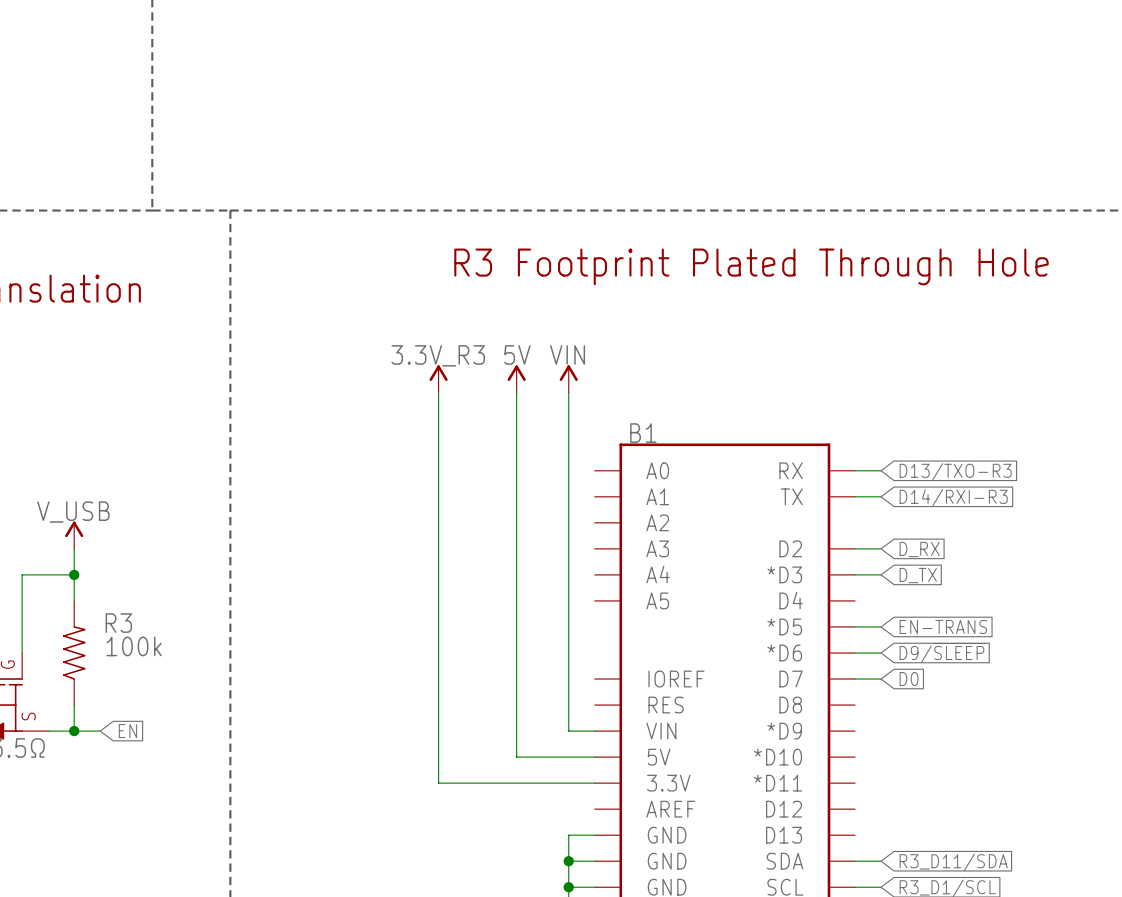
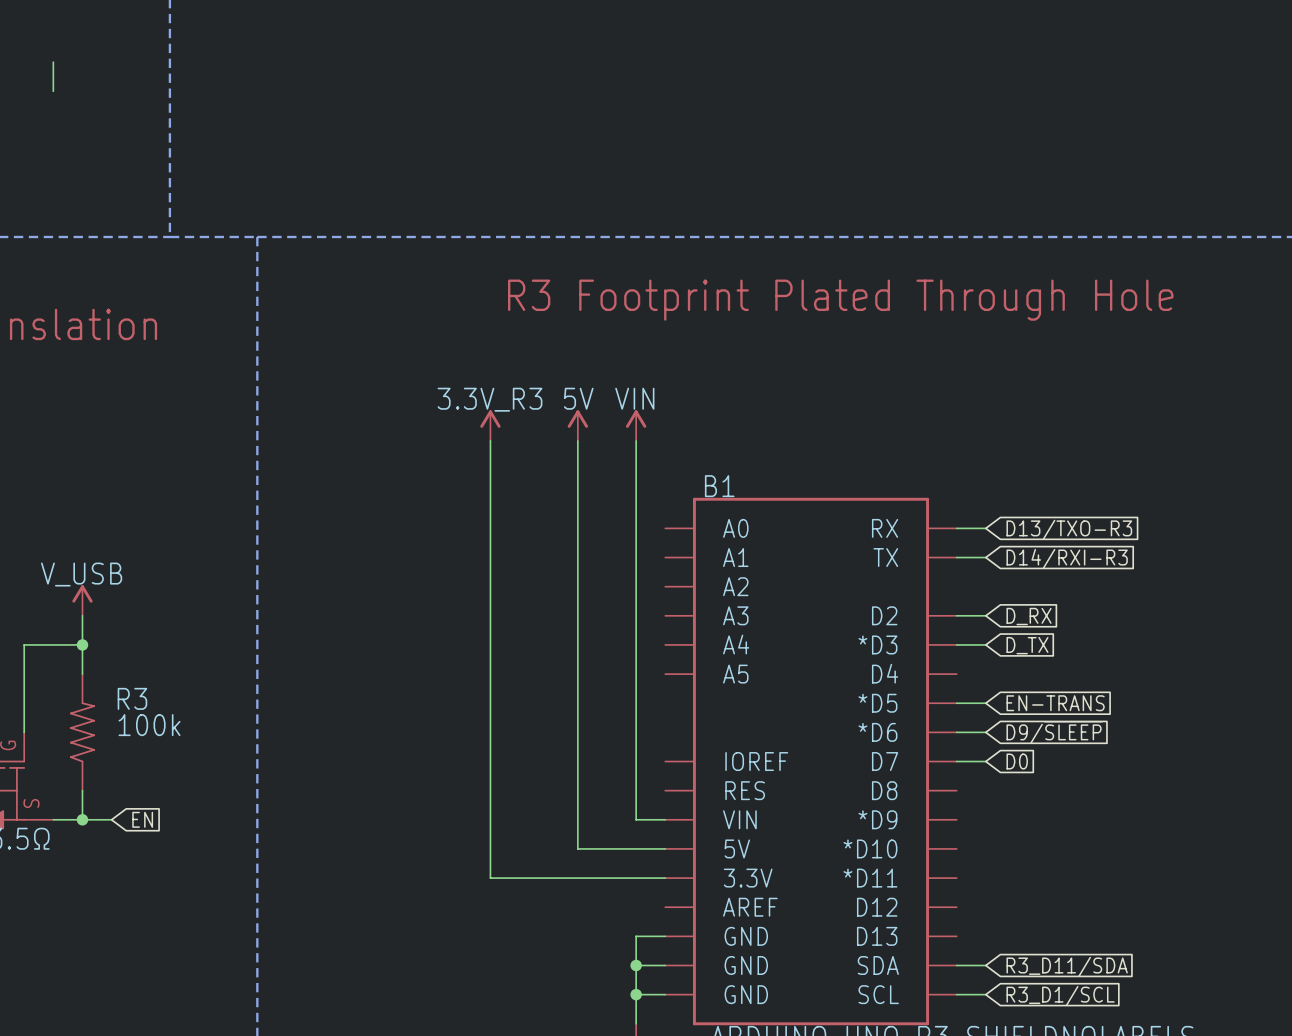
wire: none -> (53, 62) (53, 91)

